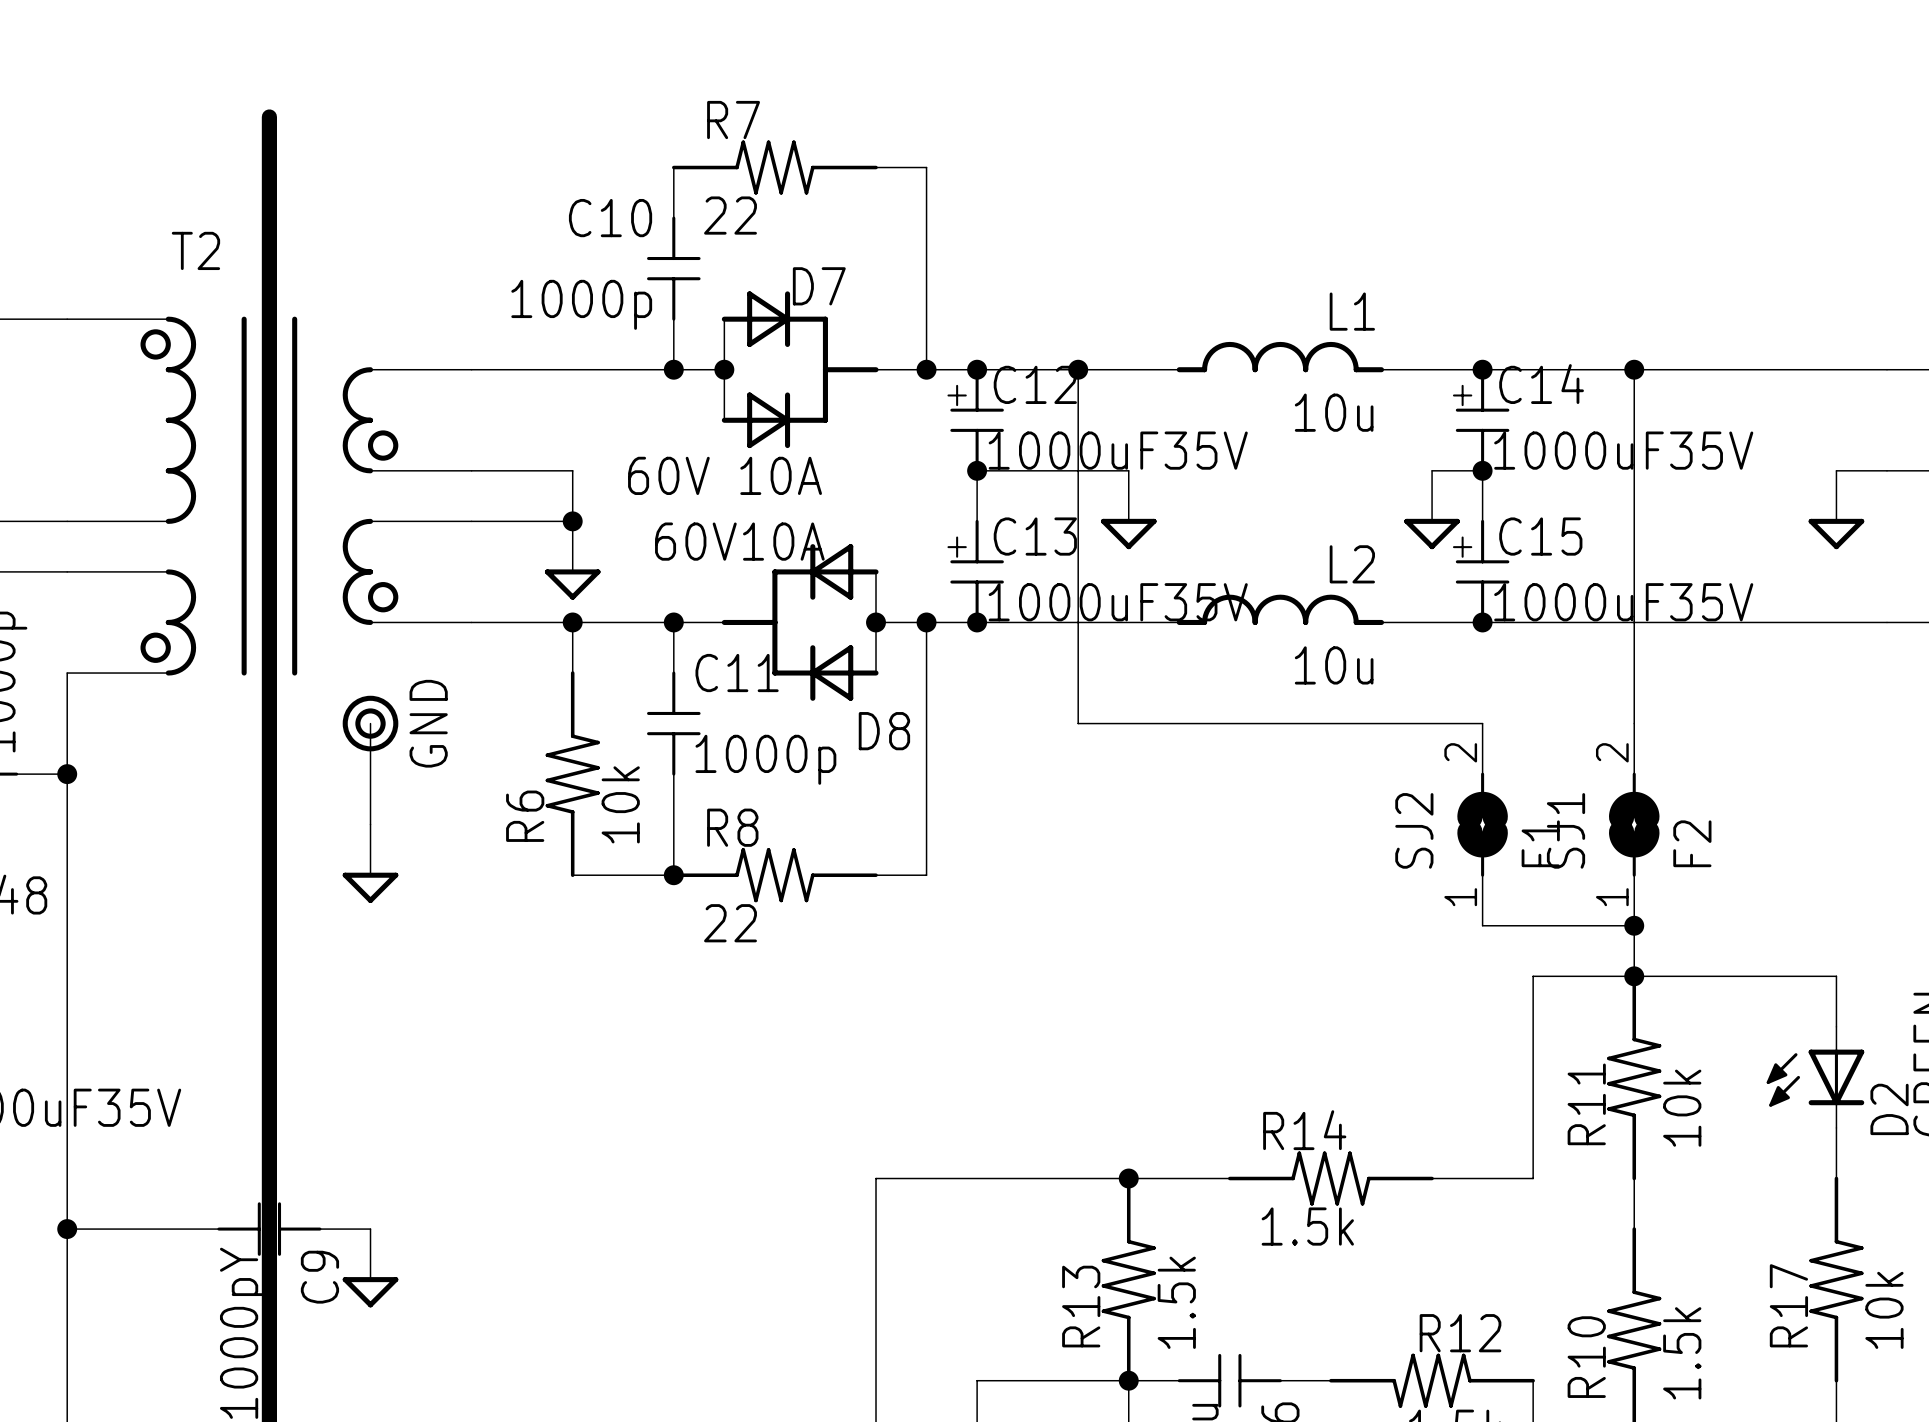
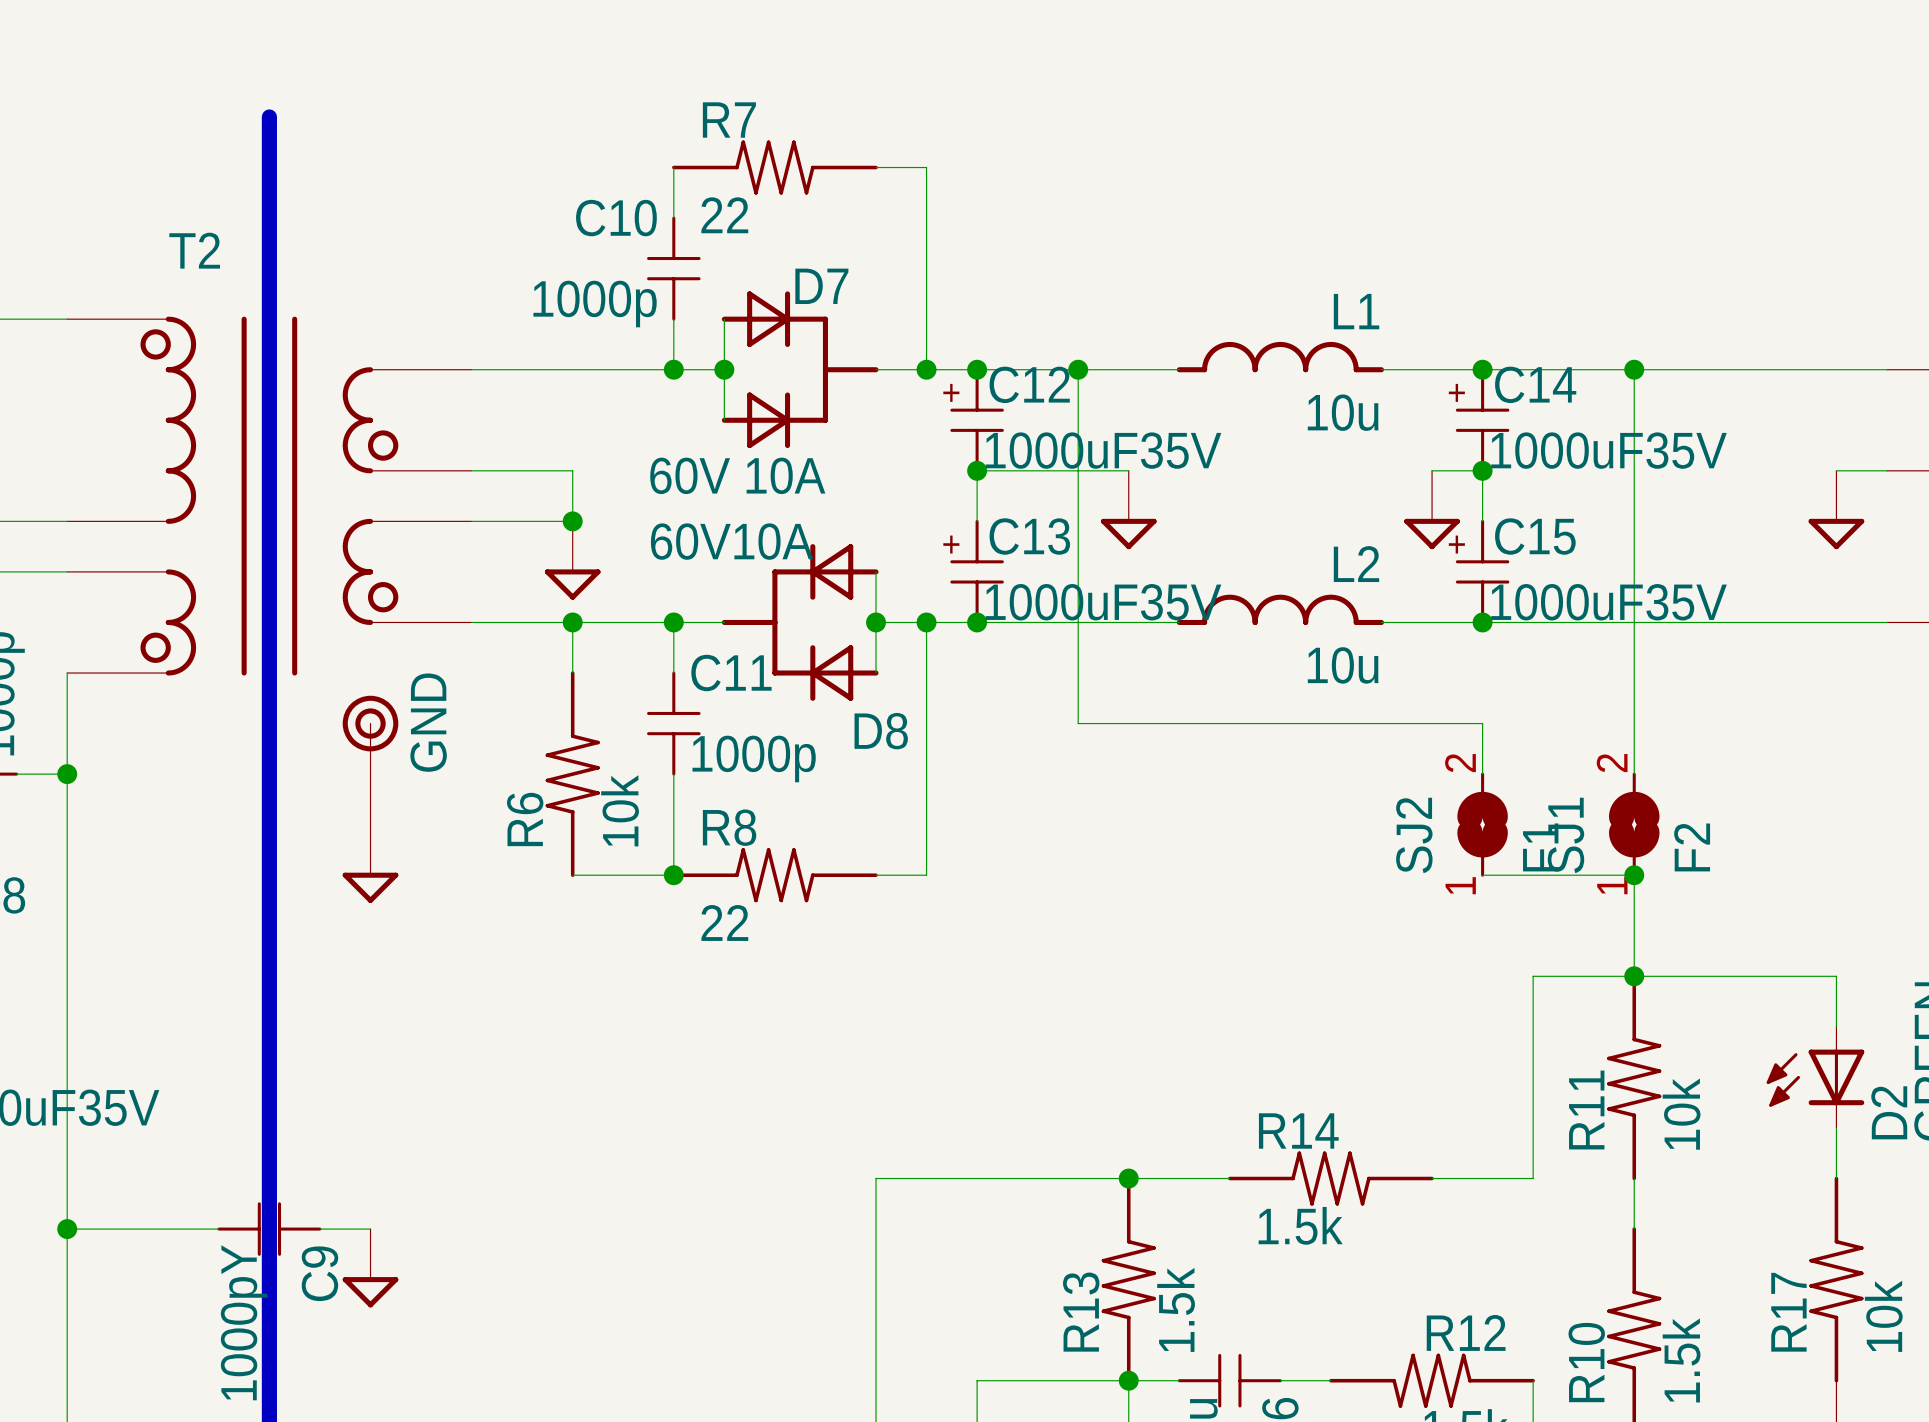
SJ2 symbol: [1457, 723, 1508, 926] -> [1457, 772, 1508, 877]
SJ1 symbol: [1608, 723, 1660, 926] -> [1608, 772, 1660, 877]
wire: (1482, 925) (1634, 925) -> (1482, 875) (1634, 875) (1634, 925)
junction position: (1634, 925) -> (1634, 875)

